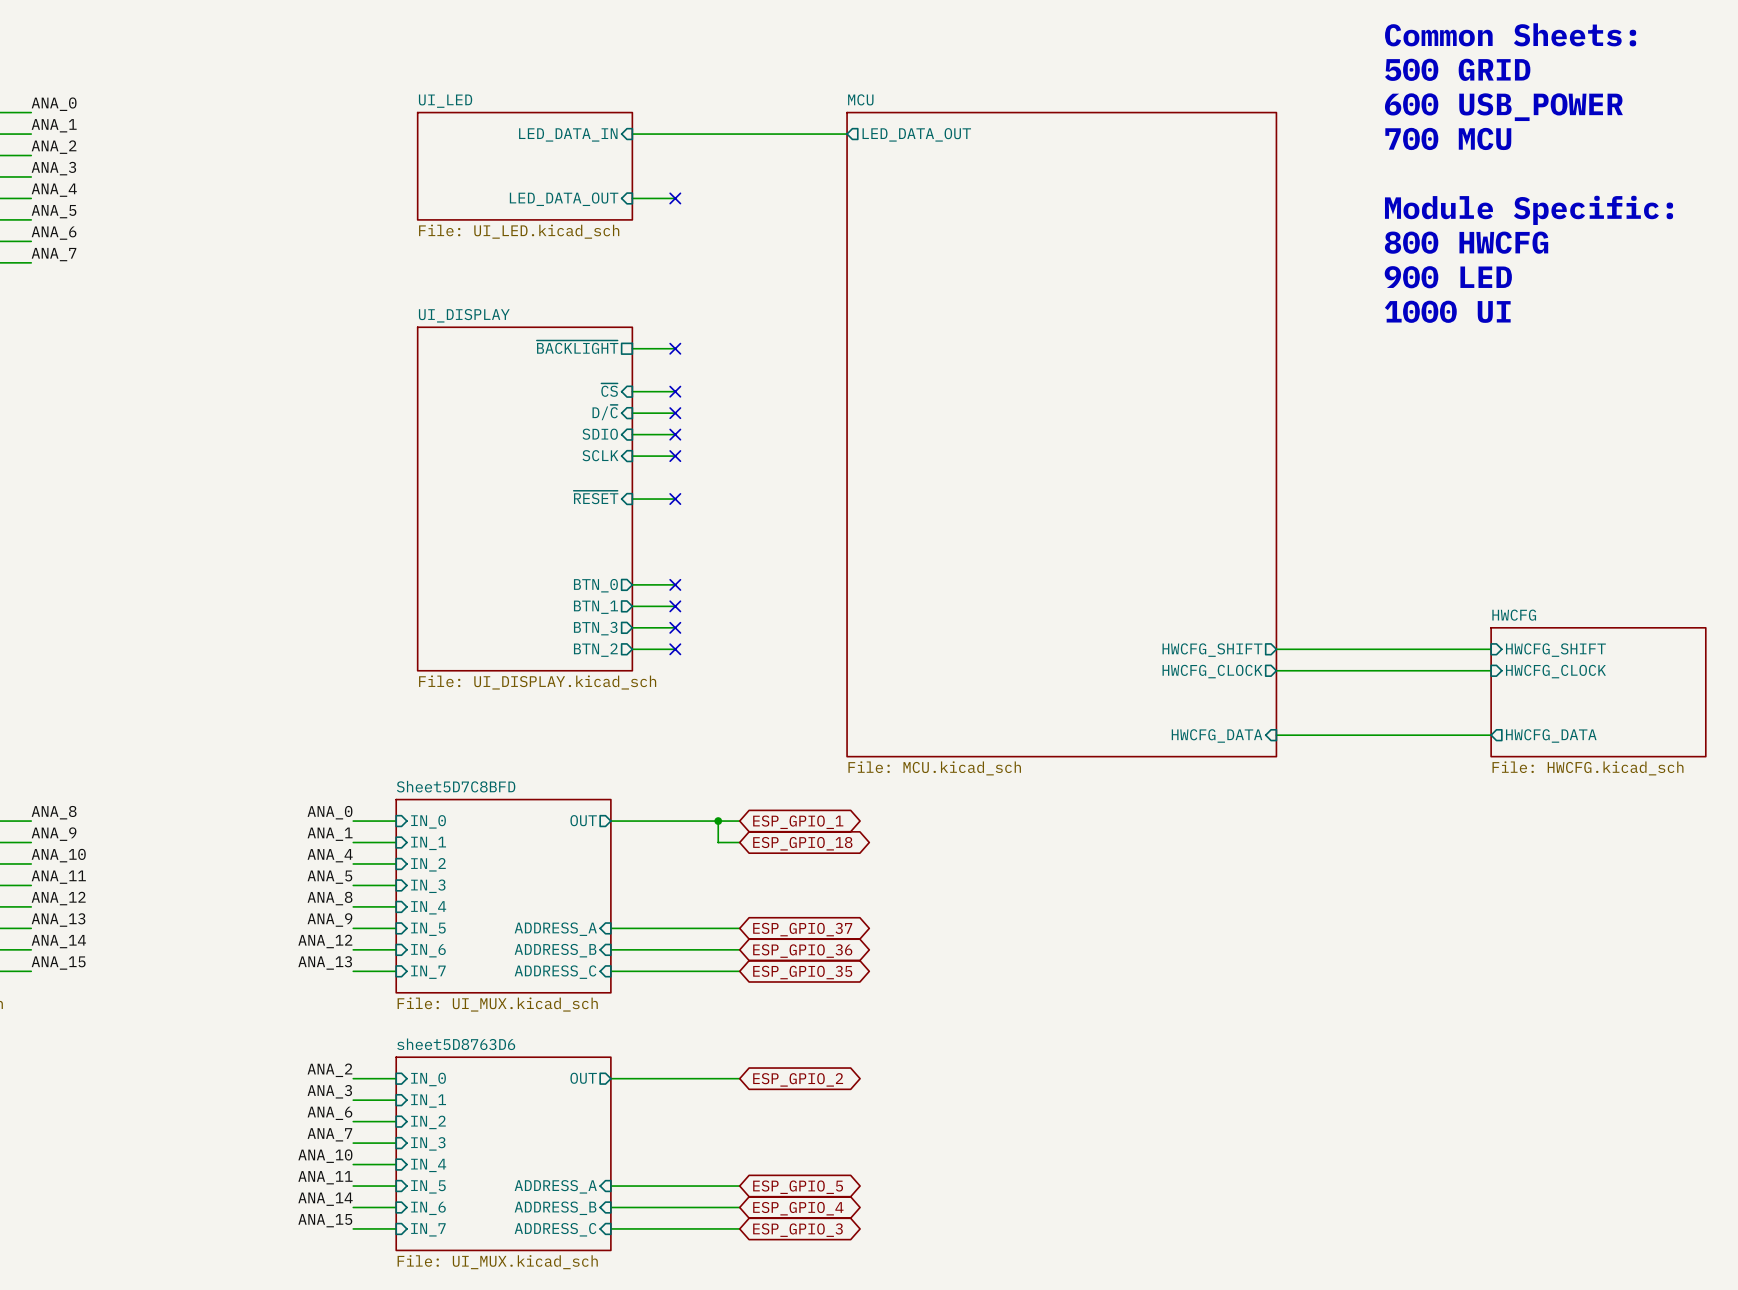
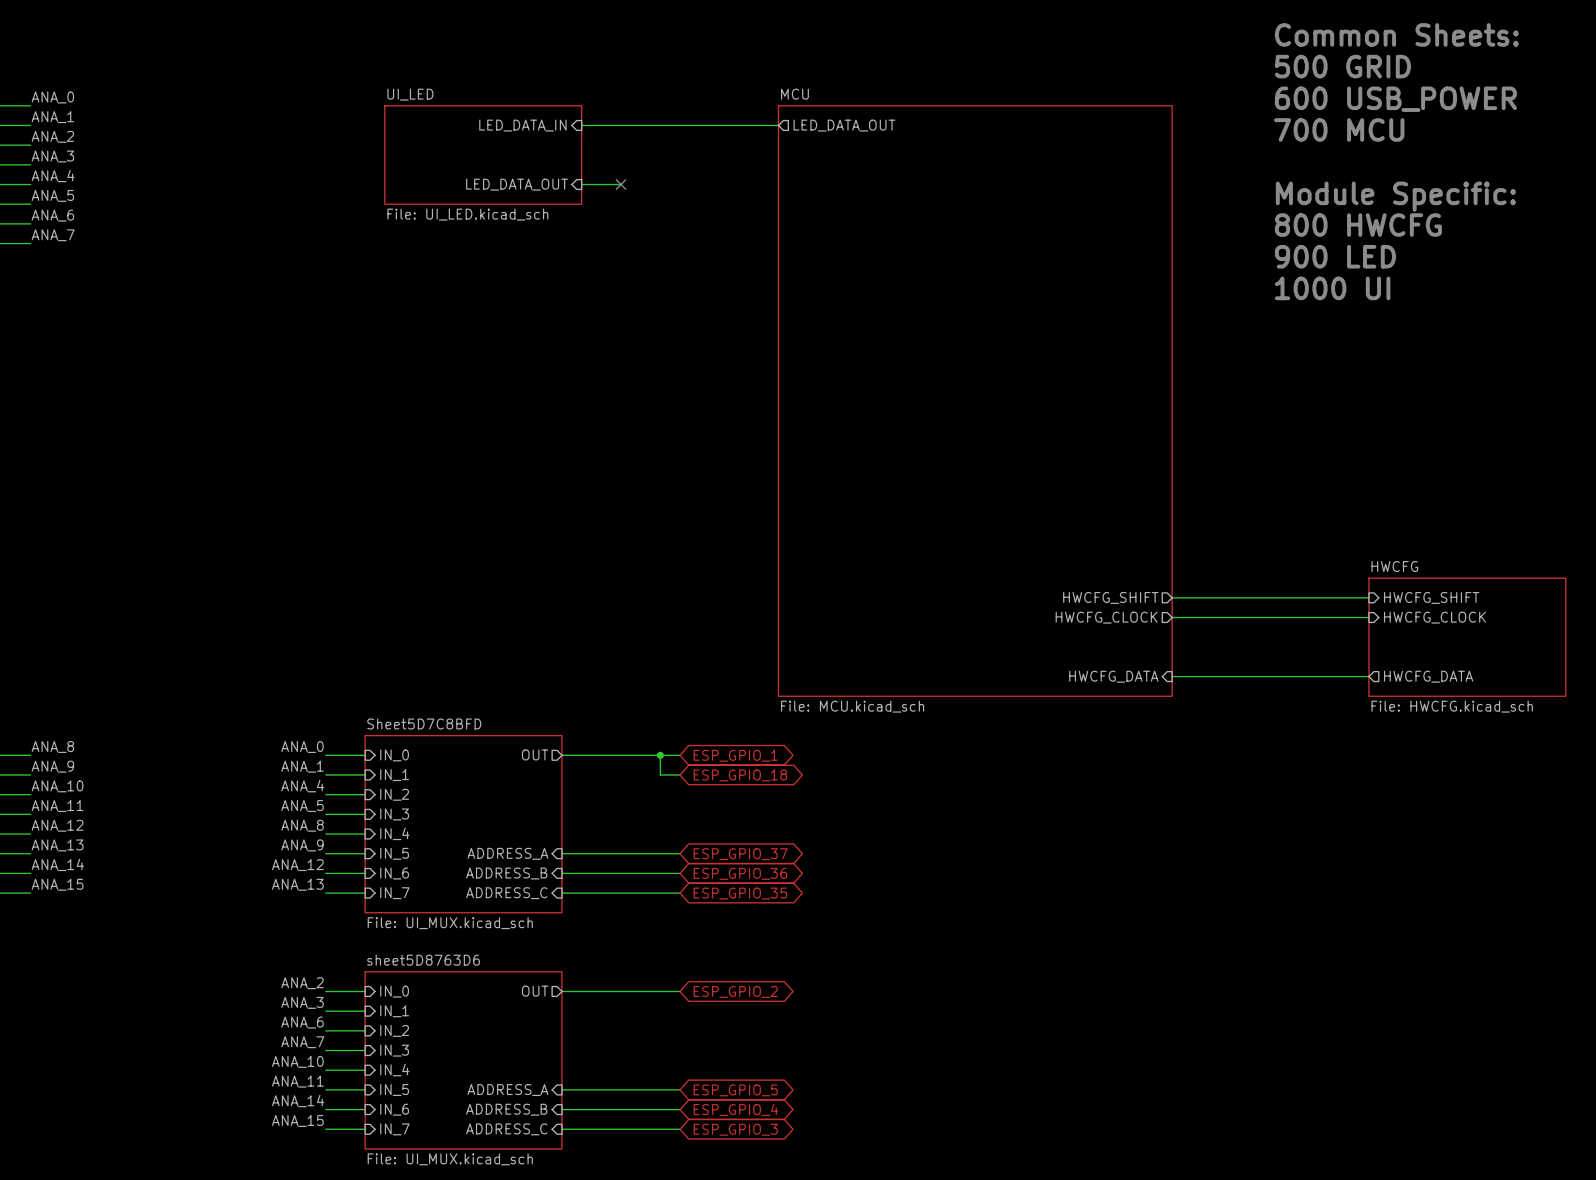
sheet pin: ~{BACKLIGHT} (577, 347) -> none
wire: (632, 348) (675, 348) -> none
no-connect mark: (675, 348) -> none
sheet pin: ~{CS} (609, 390) -> none
wire: (632, 391) (675, 391) -> none
no-connect mark: (675, 391) -> none
sheet pin: D/~{C} (605, 412) -> none
wire: (632, 413) (675, 413) -> none
no-connect mark: (675, 413) -> none
sheet pin: SDIO (600, 434) -> none
wire: (632, 434) (675, 434) -> none
no-connect mark: (675, 434) -> none
sheet pin: SCLK (600, 455) -> none
wire: (632, 456) (675, 456) -> none
no-connect mark: (675, 456) -> none
sheet pin: ~{RESET} (596, 497) -> none
sheet UI_DISPLAY: File: UI_DISPLAY.kicad_sch (525, 499) -> none
wire: (632, 499) (675, 499) -> none
no-connect mark: (675, 499) -> none
wire: (632, 584) (675, 584) -> none
no-connect mark: (675, 584) -> none
sheet pin: BTN_0 (595, 585) -> none
wire: (632, 606) (675, 606) -> none
no-connect mark: (675, 606) -> none
sheet pin: BTN_1 (595, 607) -> none
wire: (632, 627) (675, 627) -> none
no-connect mark: (675, 627) -> none
sheet pin: BTN_3 (595, 628) -> none
wire: (632, 649) (675, 649) -> none
no-connect mark: (675, 649) -> none
sheet pin: BTN_2 (595, 650) -> none

